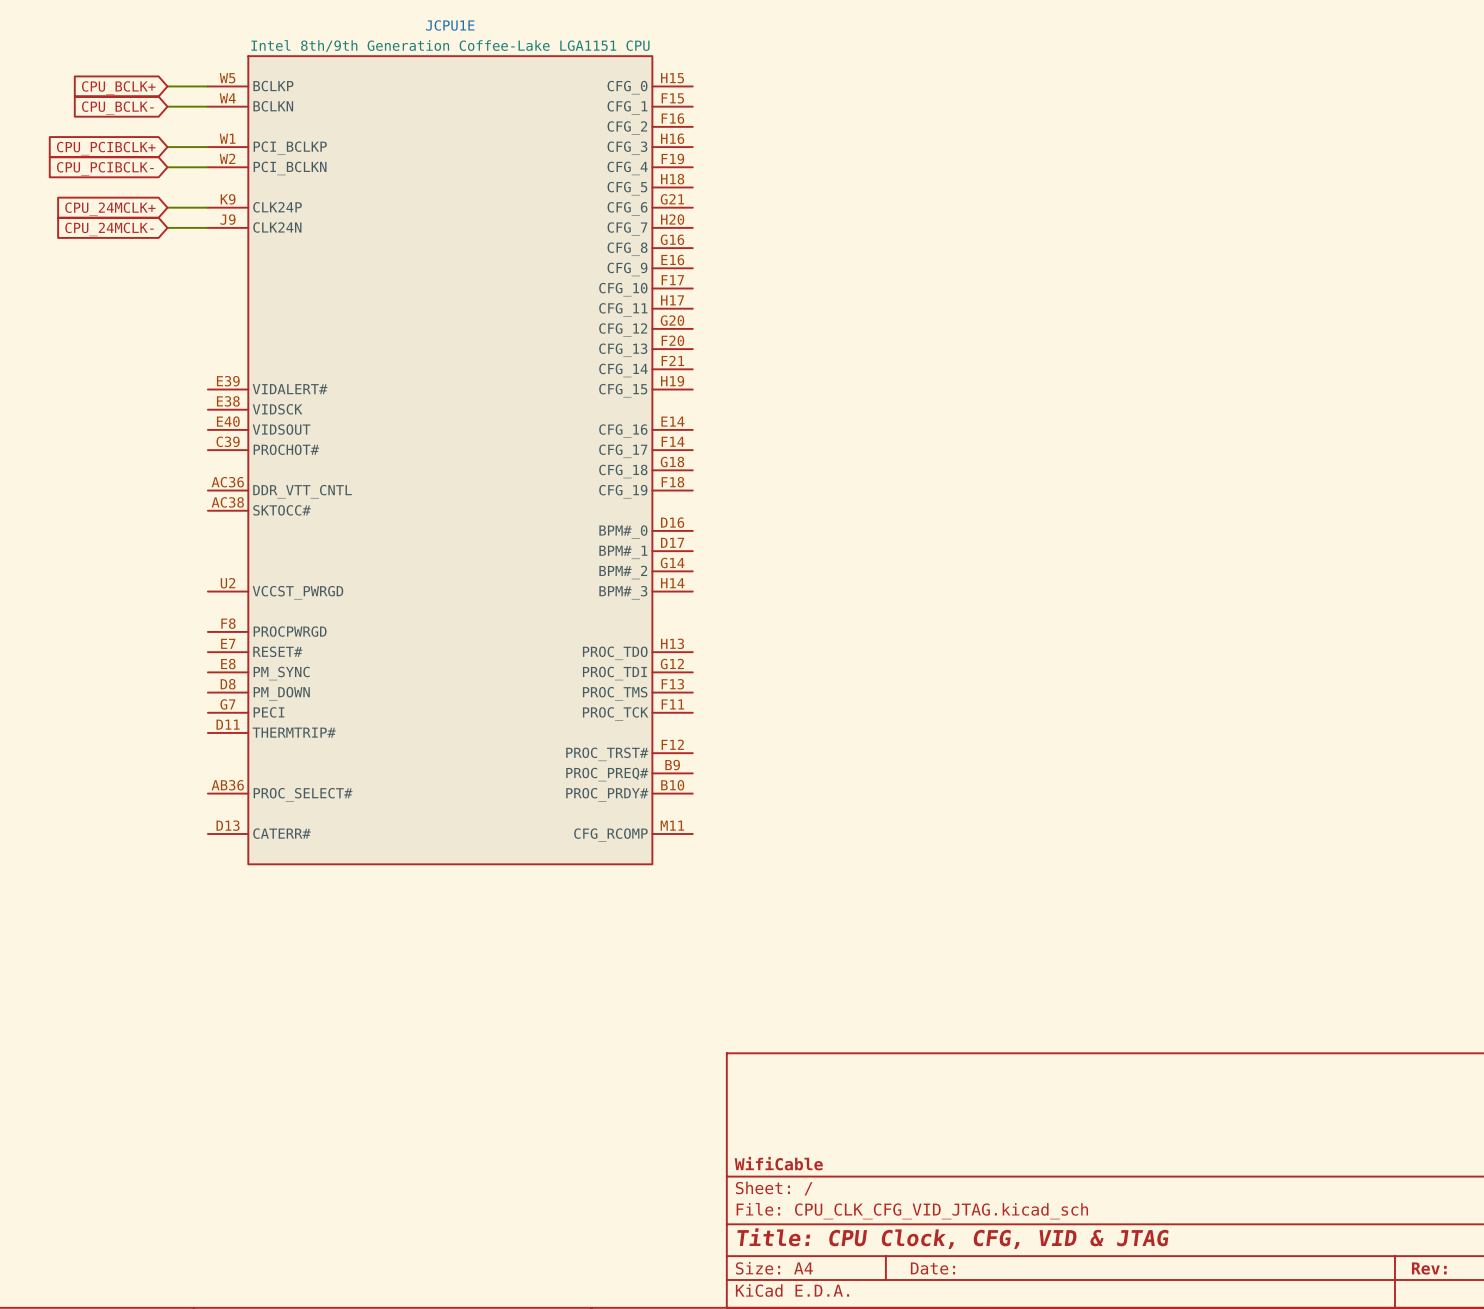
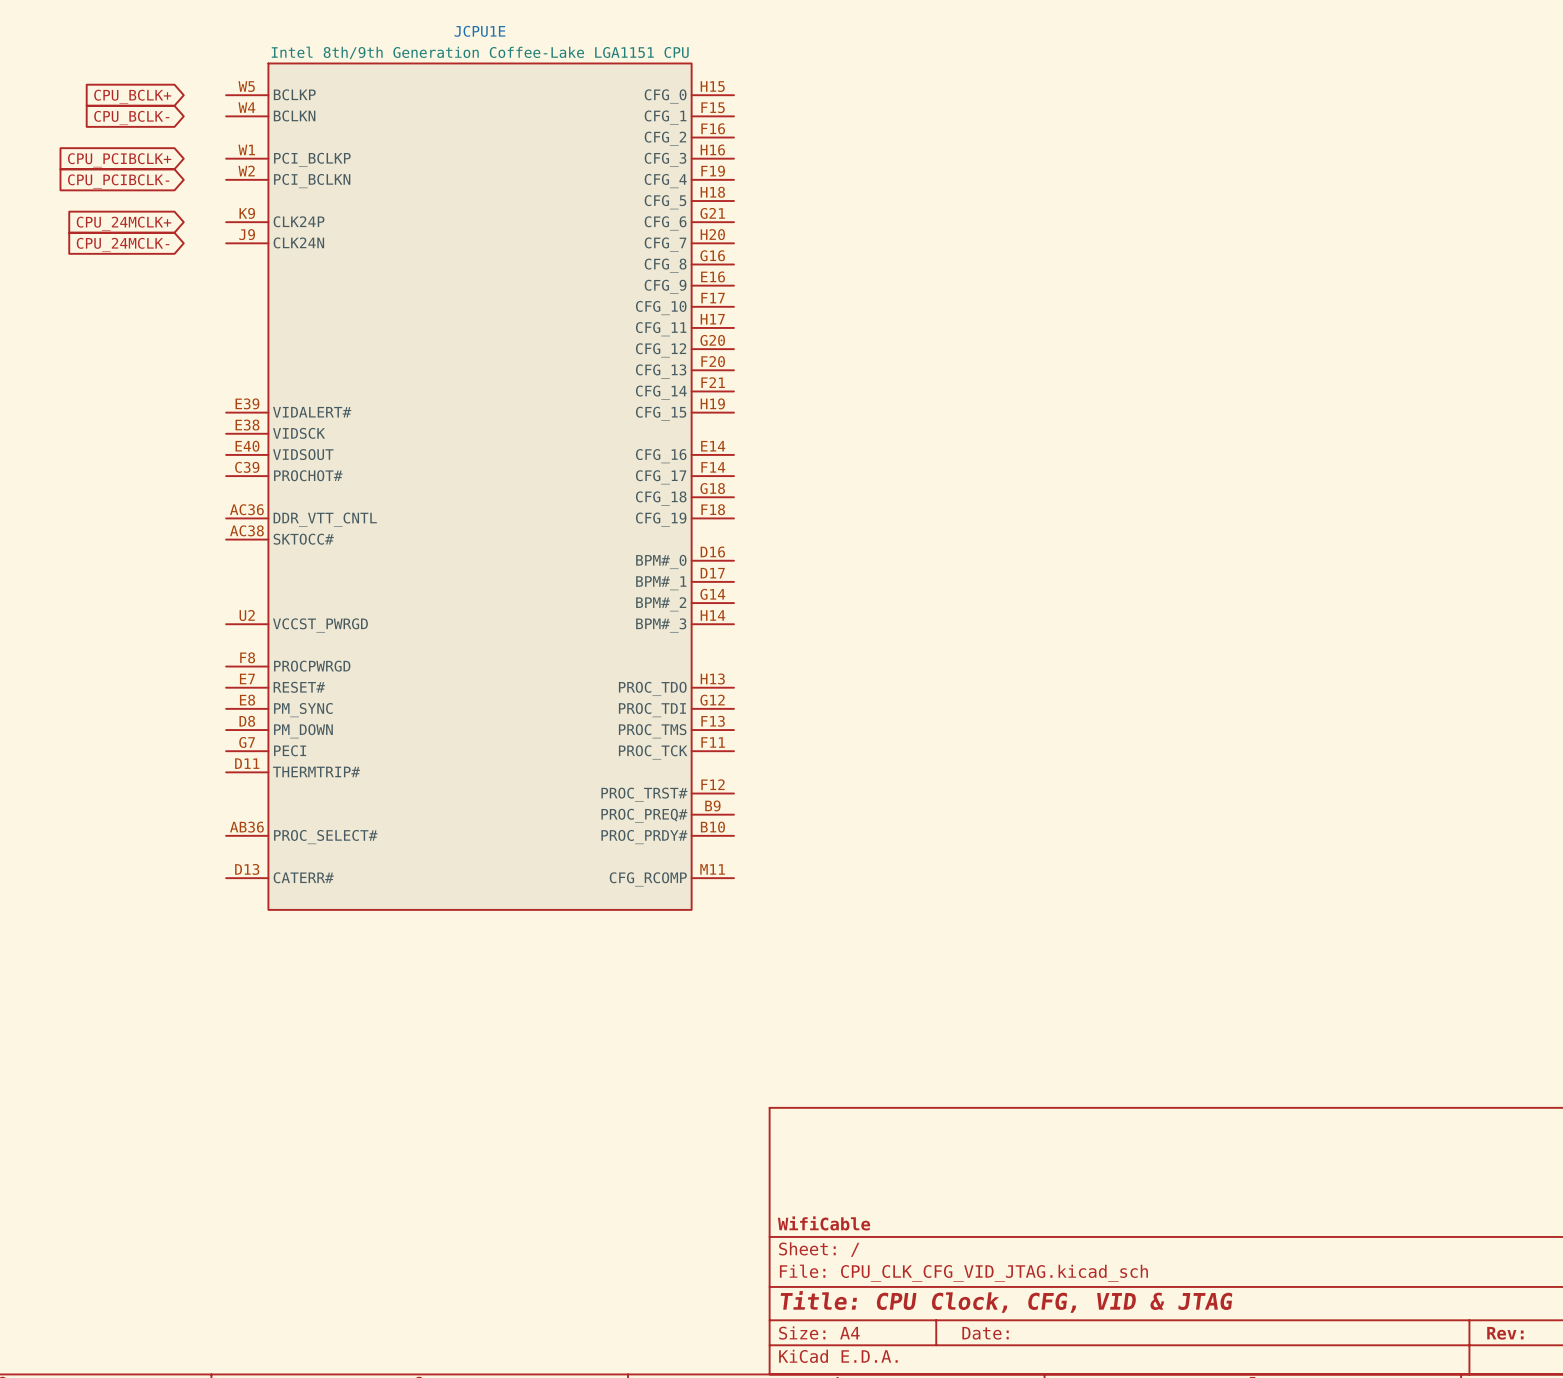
wire: (167, 86) (207, 86) -> none
wire: (167, 106) (207, 106) -> none
wire: (167, 147) (207, 147) -> none
wire: (167, 167) (207, 167) -> none
wire: (167, 207) (207, 207) -> none
wire: (167, 227) (207, 227) -> none

